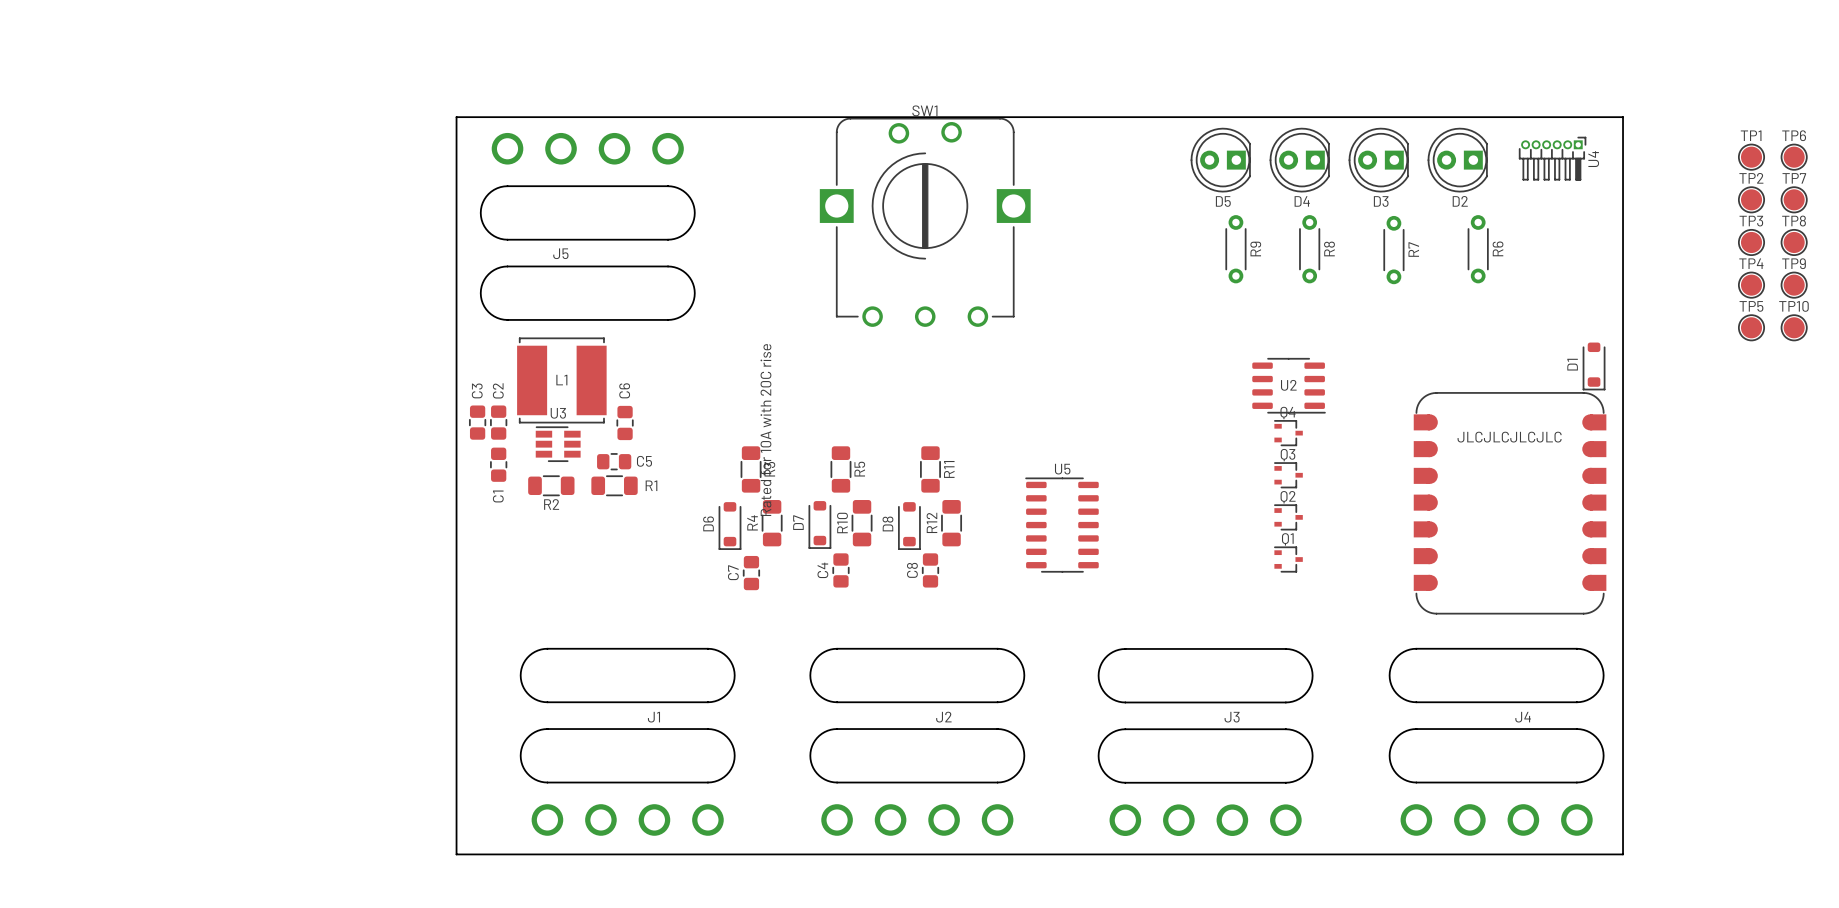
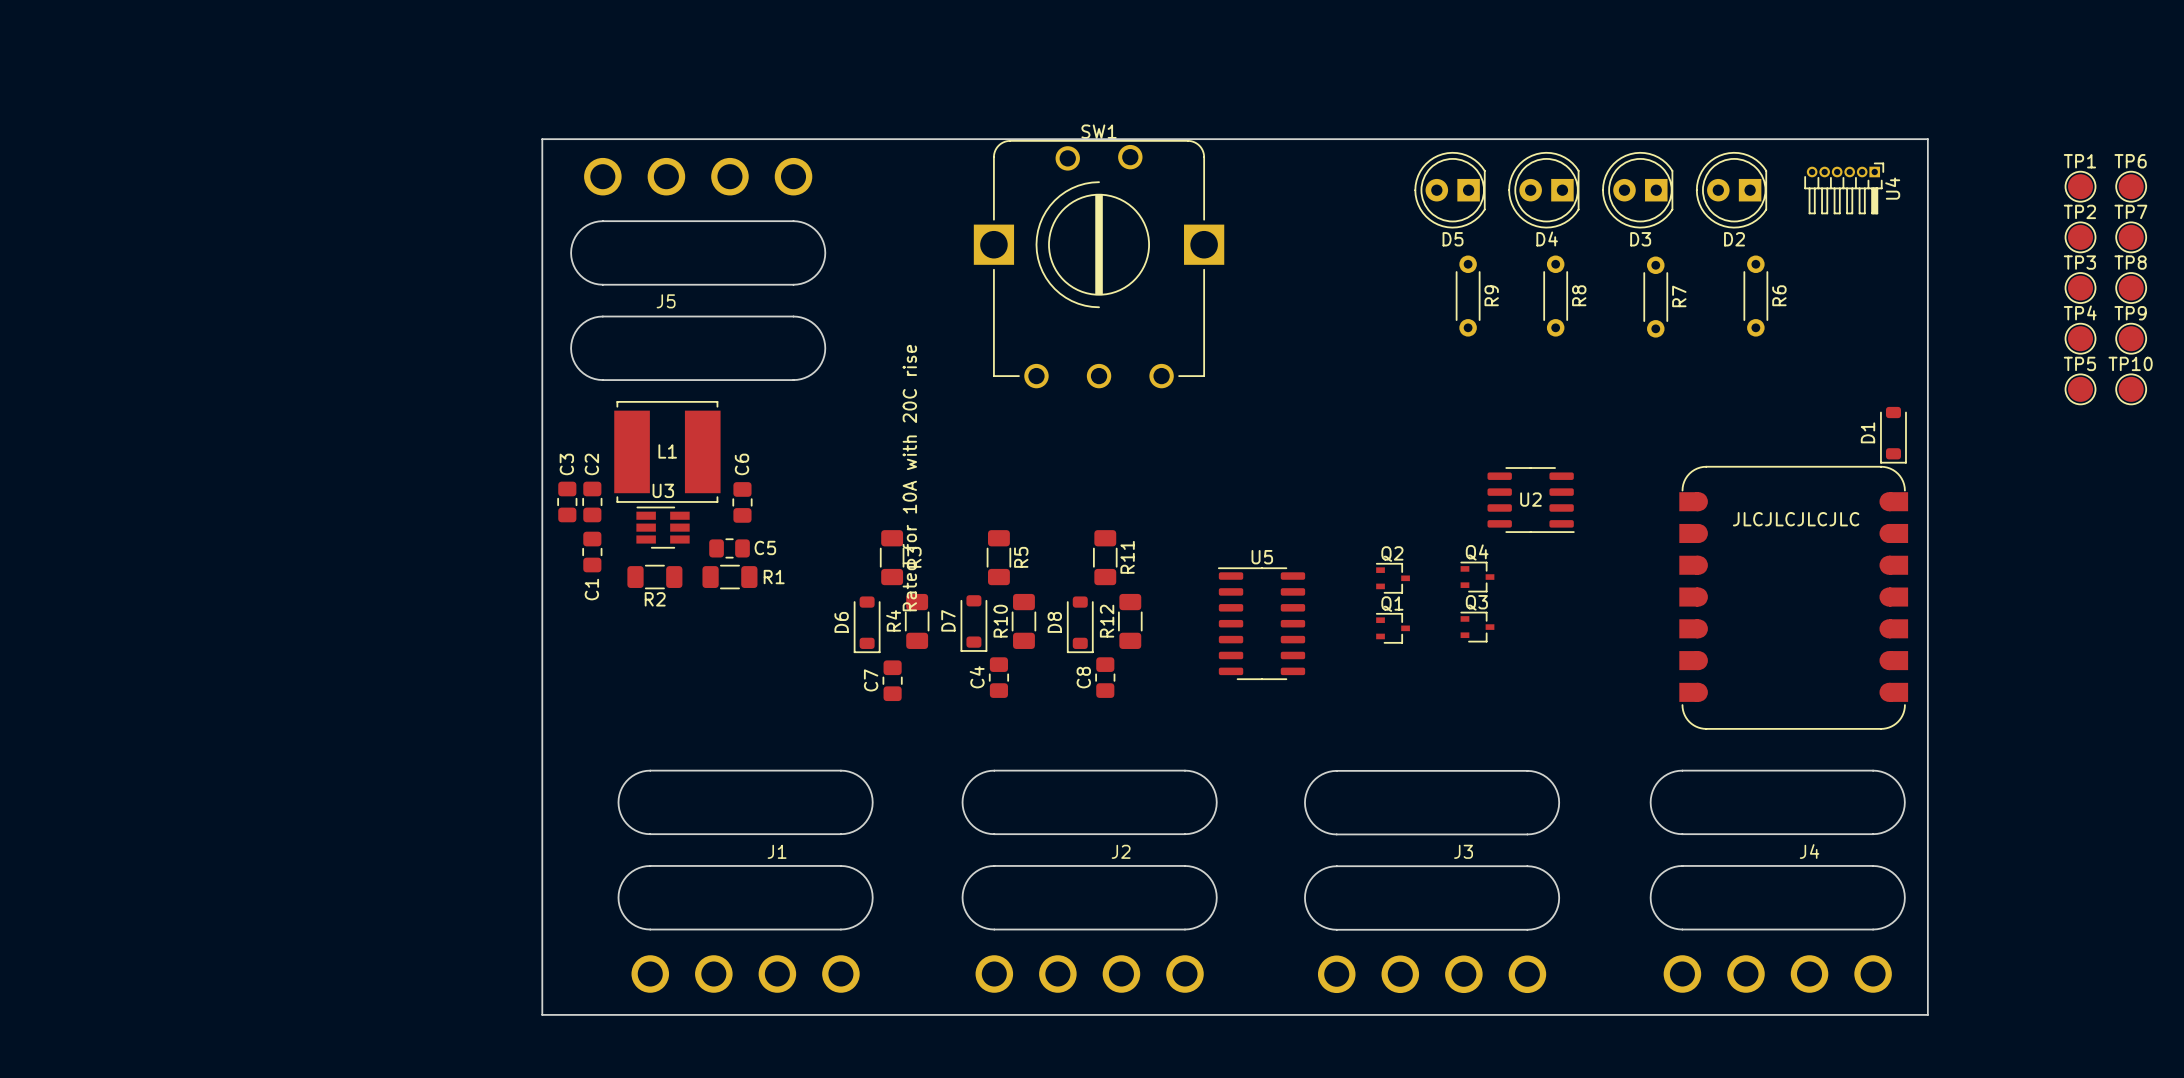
U2 position: (1288, 385) -> (1531, 500)
Q4 position: (1288, 433) -> (1477, 577)
Q3 position: (1288, 475) -> (1477, 627)
Q2 position: (1288, 517) -> (1392, 578)
Q1 position: (1288, 559) -> (1392, 628)

